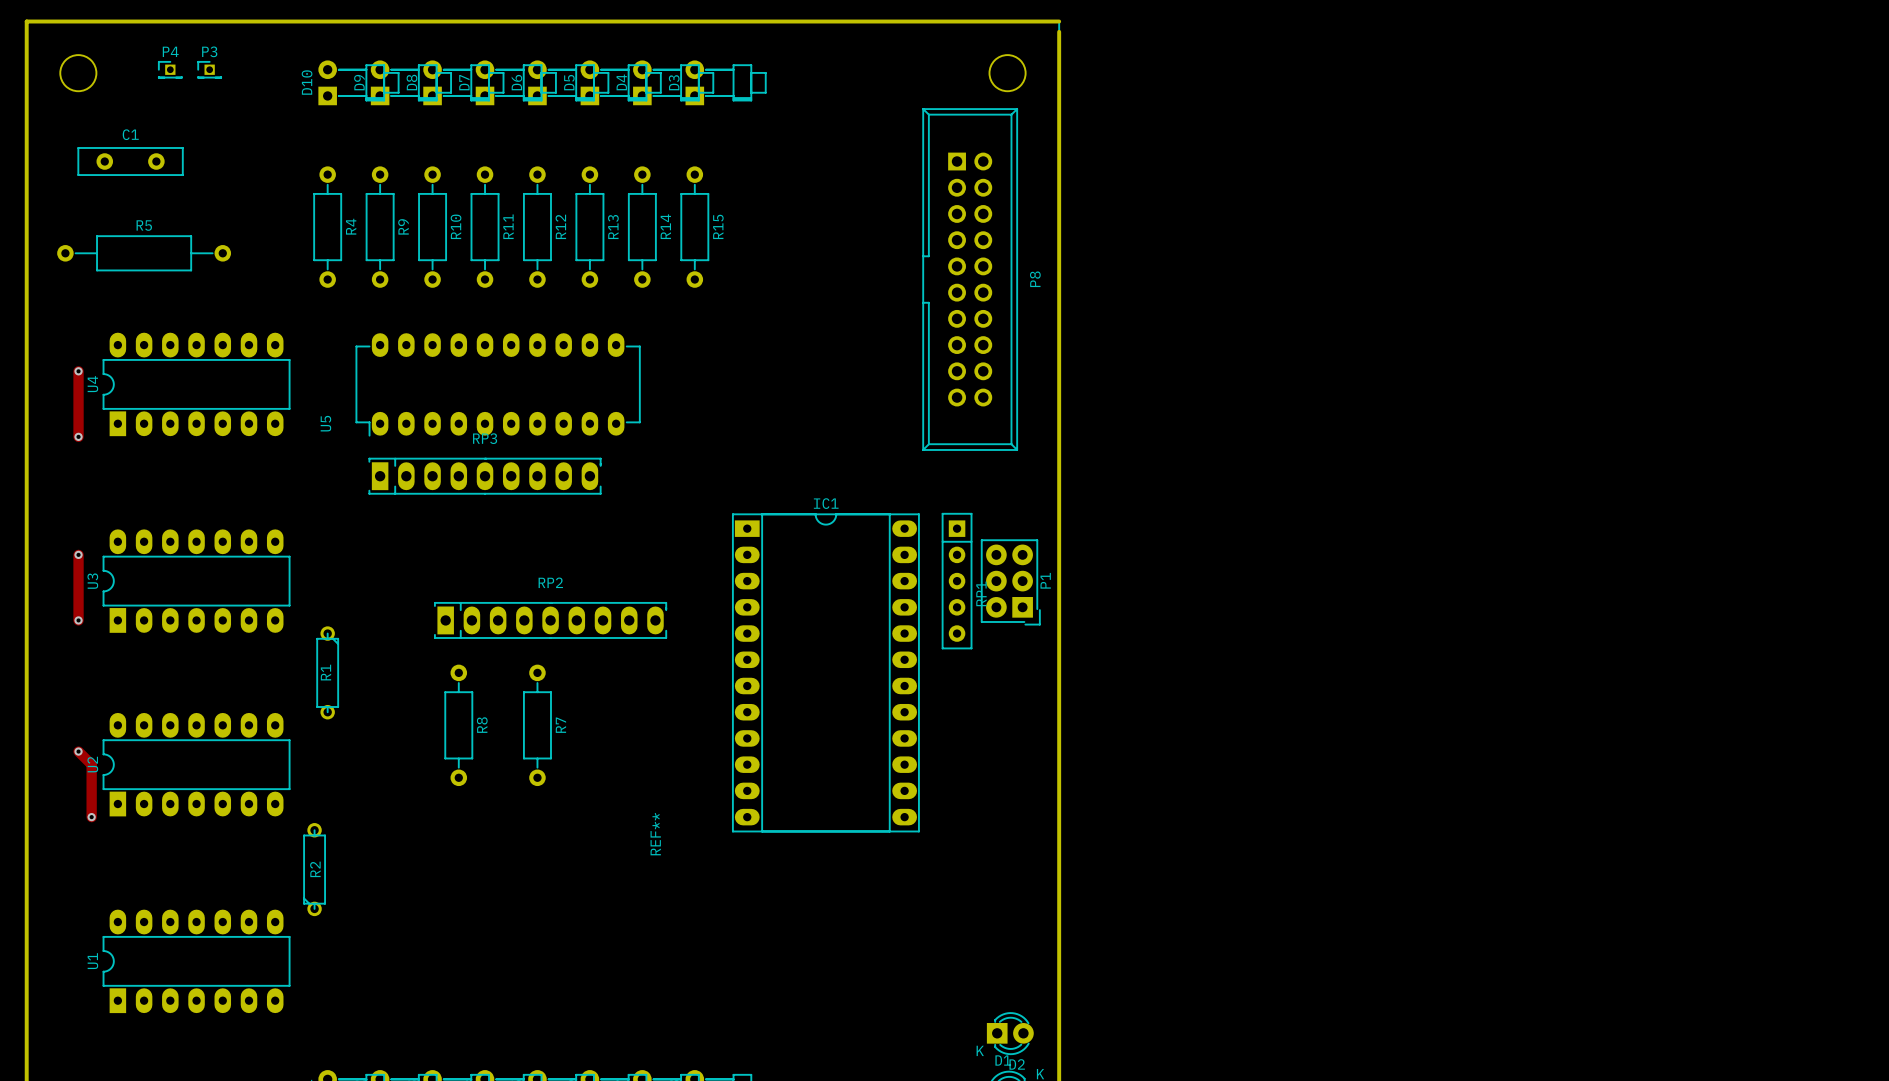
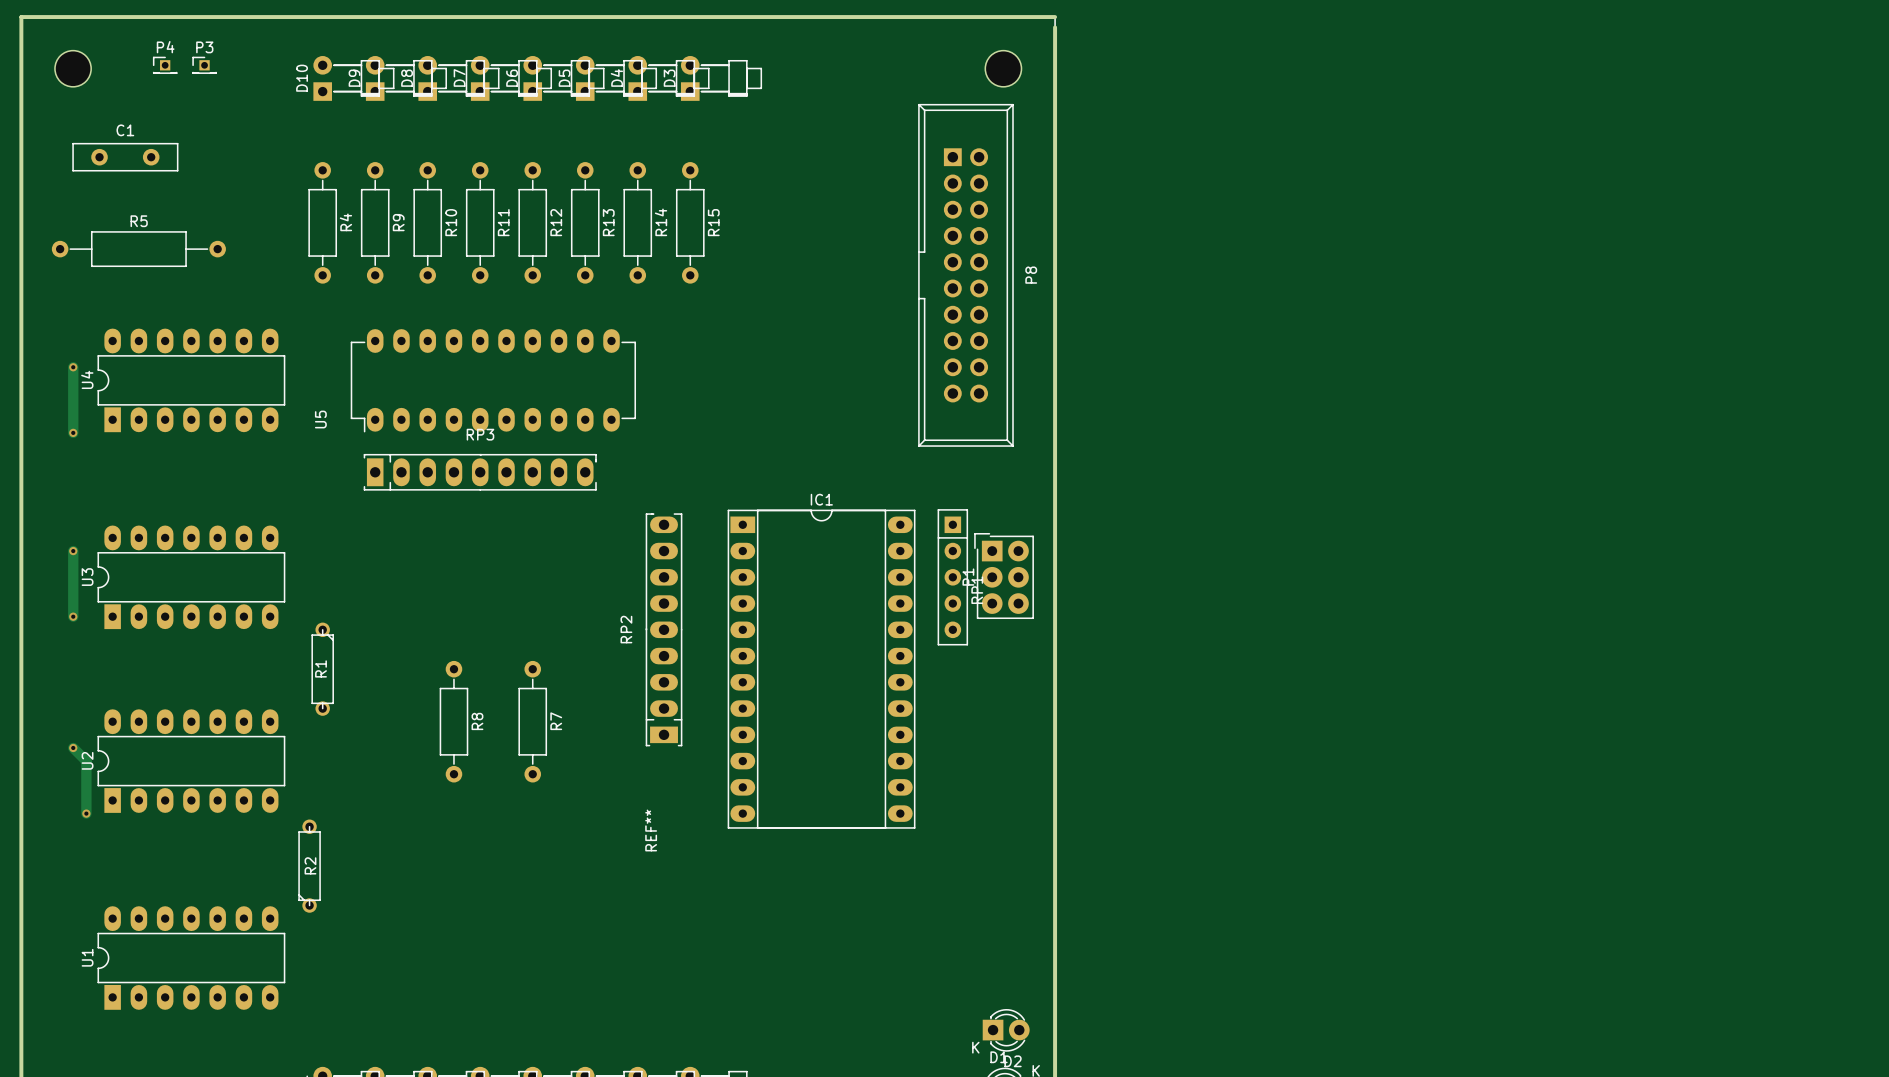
P1 rotation: 0° (1010, 582) -> 180° (1004, 576)
RP2 rotation: 0° (550, 620) -> 90° counterclockwise (664, 629)

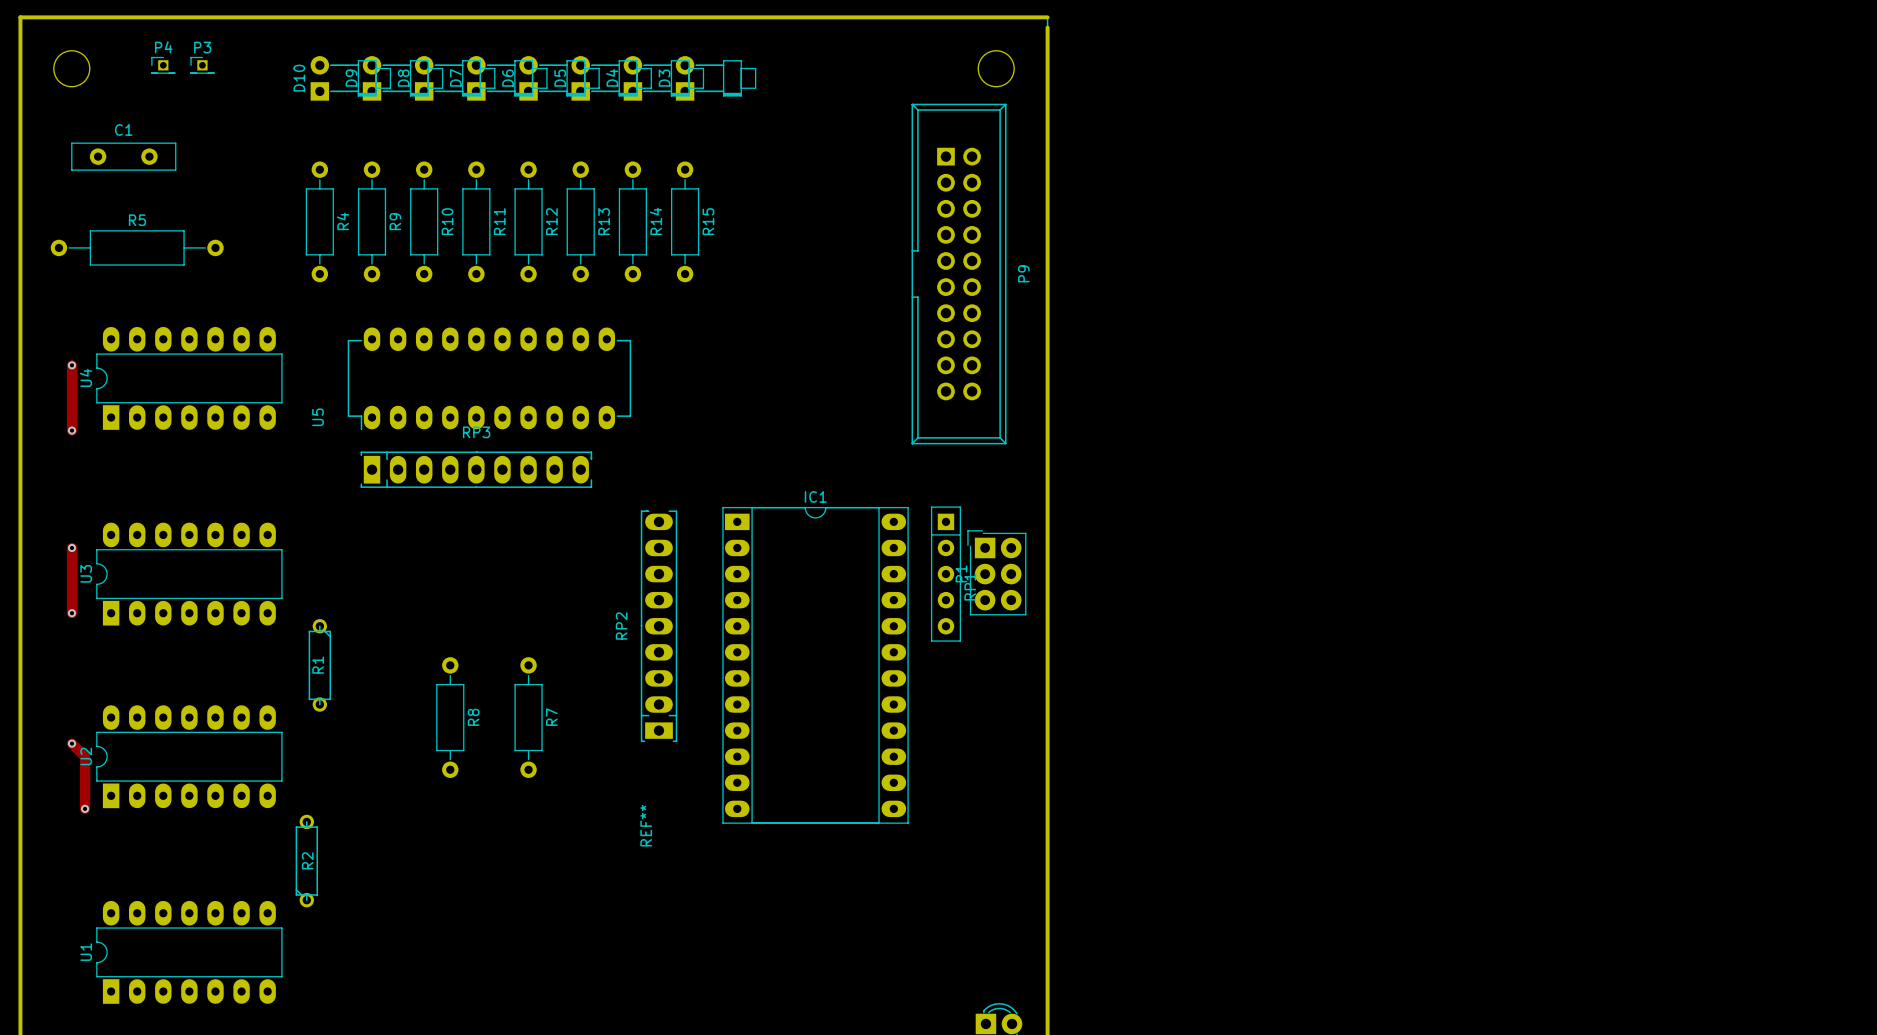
P8 name: P8 (1031, 275) -> P9 (1023, 273)

